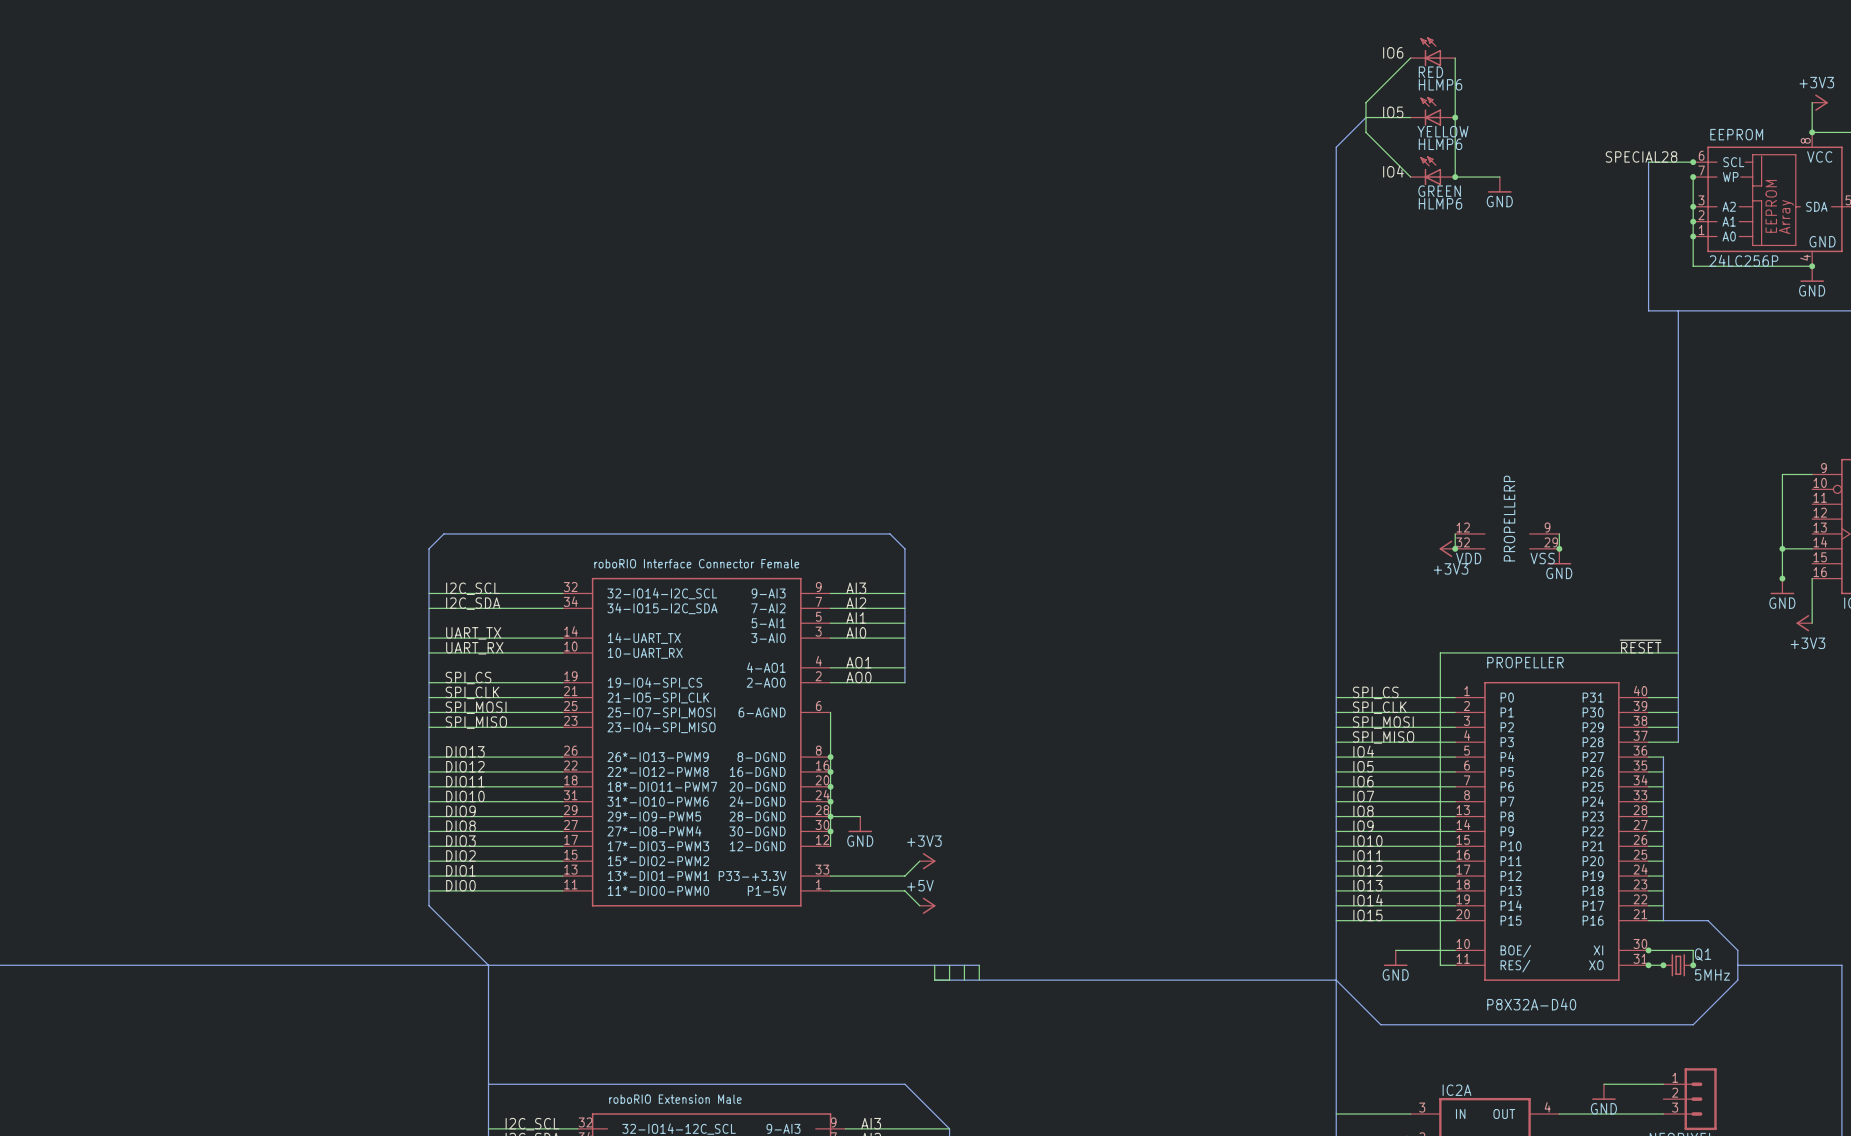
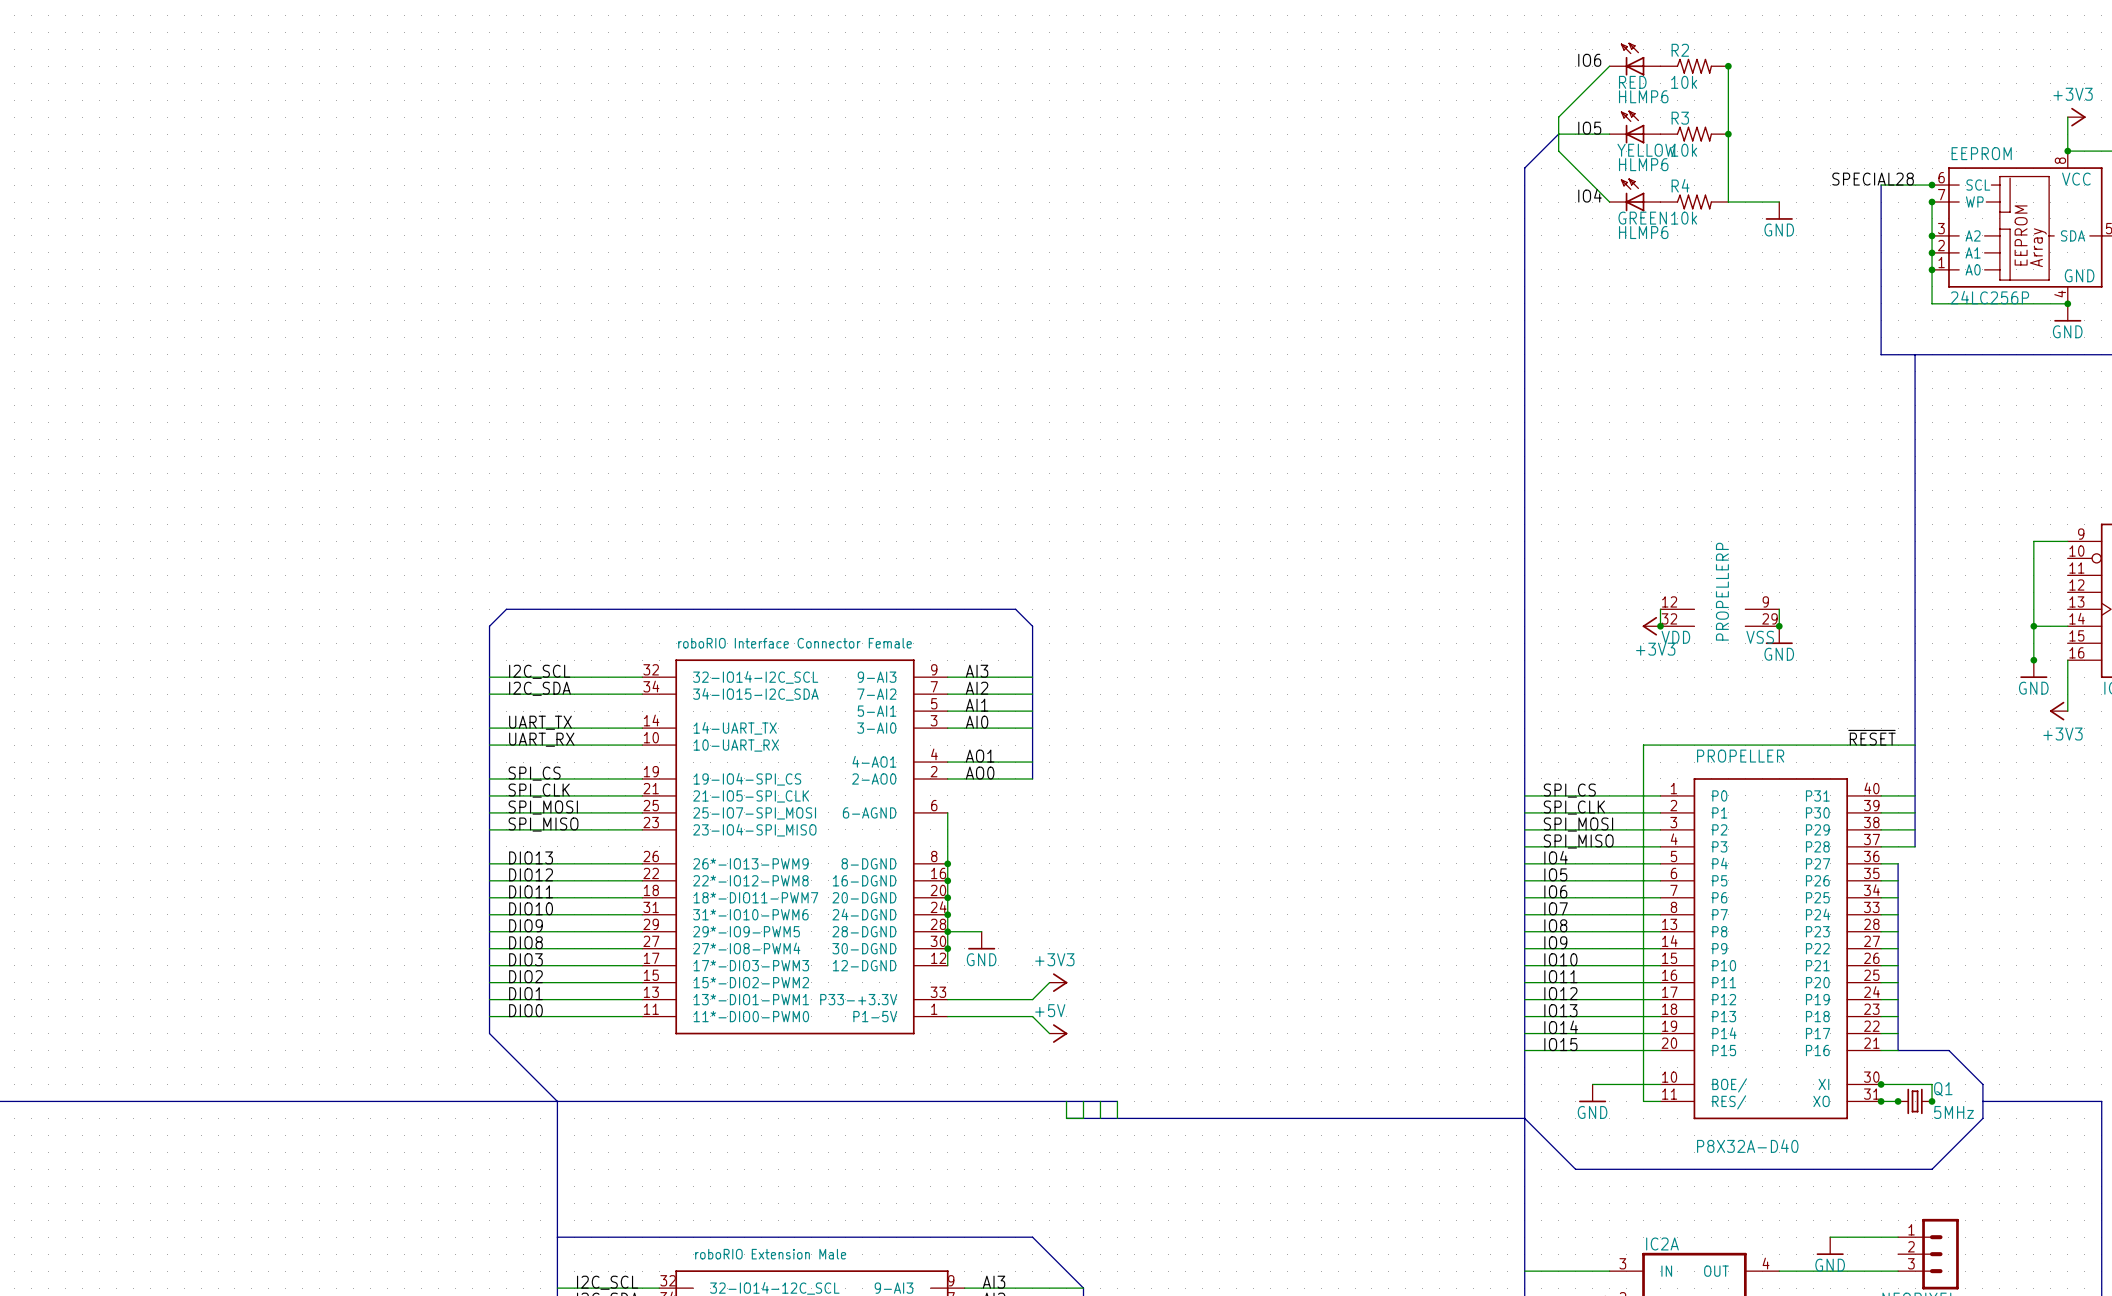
wire: (1455, 58) (1455, 177) (1499, 177) -> (1728, 66) (1728, 202) (1779, 202)
R2: none -> 10k (1694, 66)
junction: none -> (1728, 66)
junction: (1455, 117) -> none
R3: none -> 10k (1694, 134)
junction: none -> (1728, 134)
junction: (1455, 177) -> none
R4: none -> 10k (1694, 202)
power symbol position: GND (1499, 184) -> GND (1779, 210)

